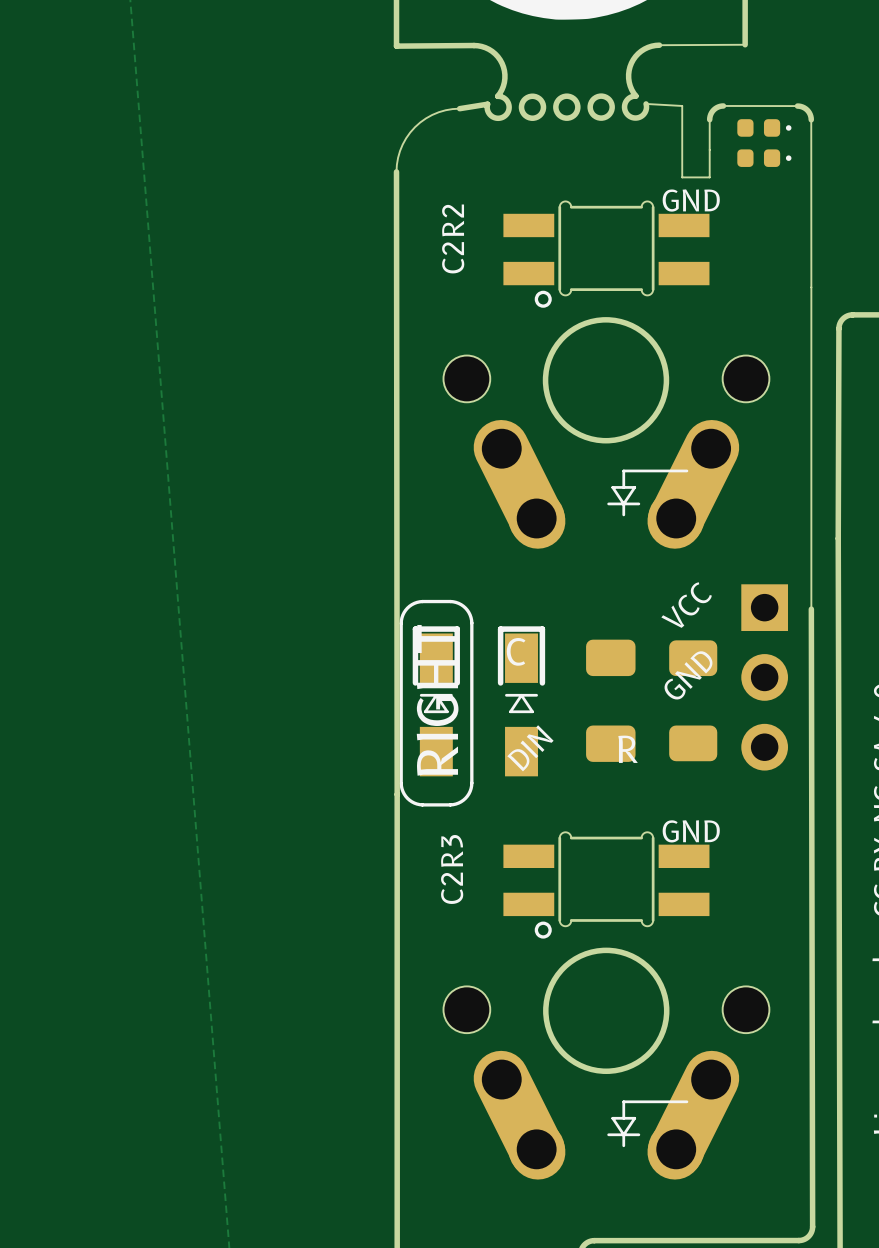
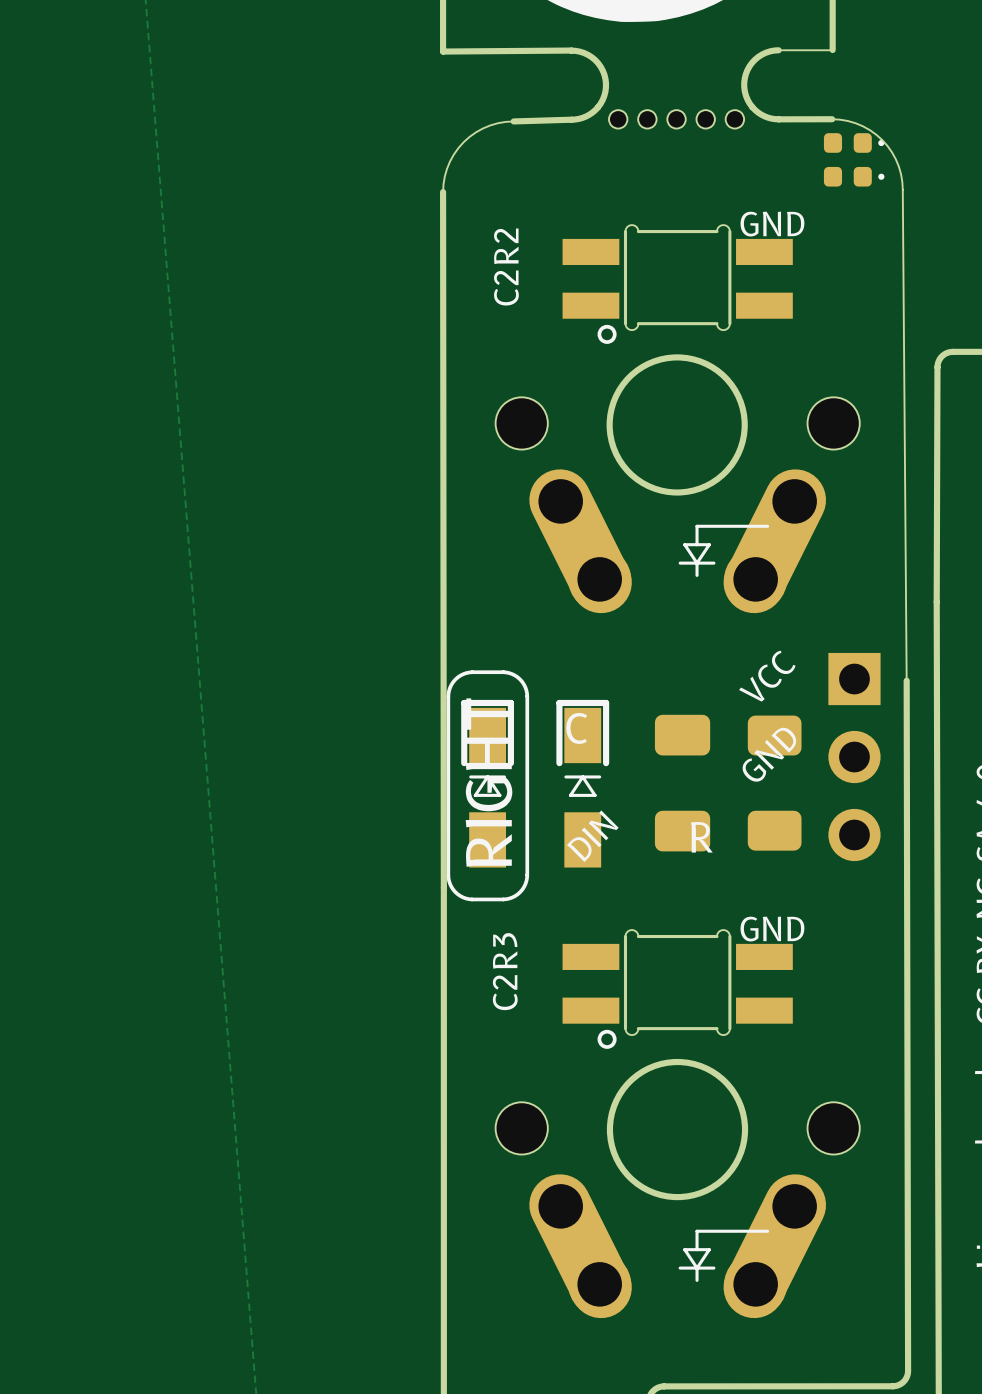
board edge: (745, 44) (659, 45) (644, 49) (635, 56) (630, 66) (629, 82) (635, 96) (627, 99) (624, 108) (628, 115) (636, 118) (644, 113) (646, 103) (682, 105) (682, 177) (709, 177) (709, 117) (712, 111) (718, 107) (799, 106) (805, 108) (810, 114) (811, 609) -> (832, 50) (778, 50) (765, 52) (754, 59) (749, 66) (744, 78) (744, 87) (745, 95) (752, 107) (767, 117) (840, 119) (855, 123) (869, 130) (887, 145) (895, 159) (901, 174) (902, 189) (906, 680)
board edge: (474, 45) (492, 51) (502, 63) (504, 78) (497, 96) (507, 101) (508, 110) (504, 115) (497, 118) (489, 113) (487, 104) (459, 108) -> (529, 50) (571, 50) (588, 54) (598, 63) (602, 70) (605, 83) (605, 91) (597, 107) (582, 117) (513, 121)
round board edge: [518, 93, 547, 121] -> none
round board edge: [553, 93, 581, 121] -> none
round board edge: [587, 93, 615, 121] -> none
part: none -> (676, 119)

